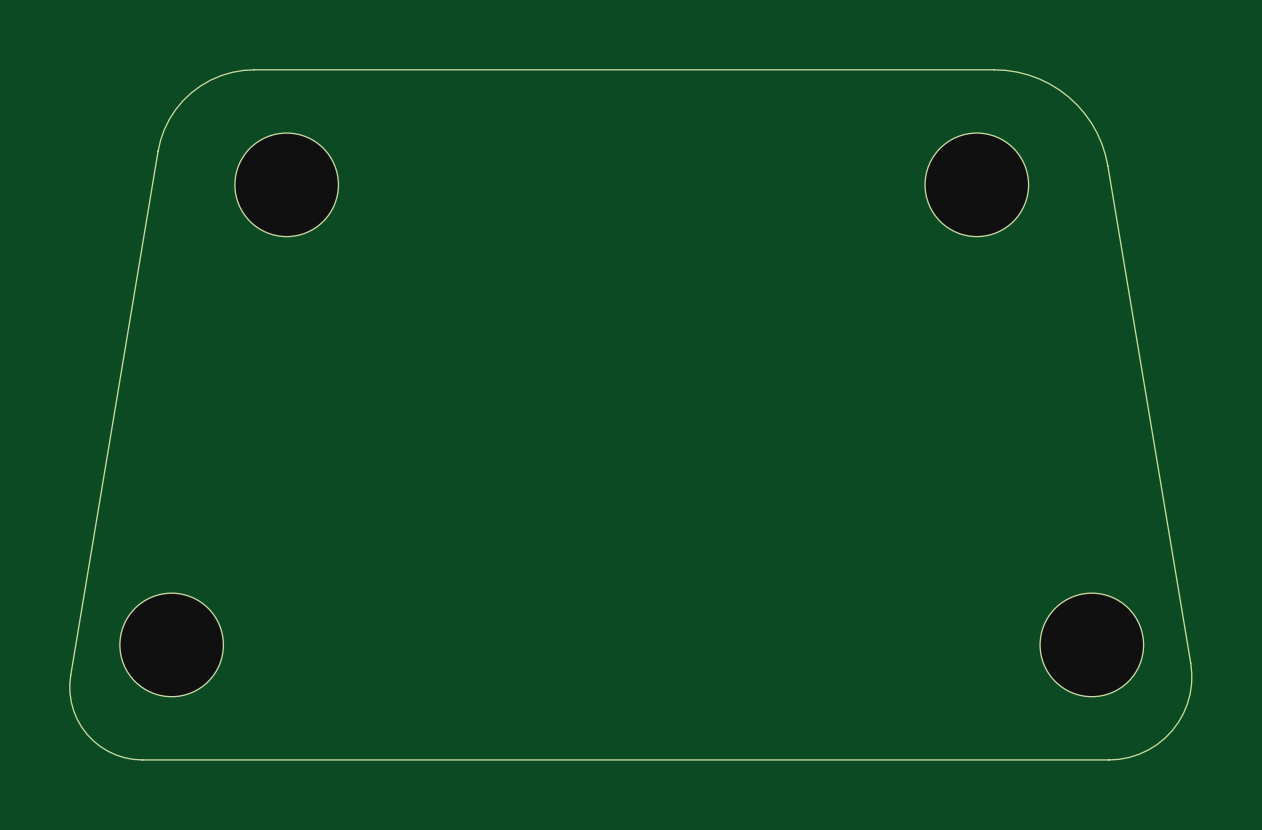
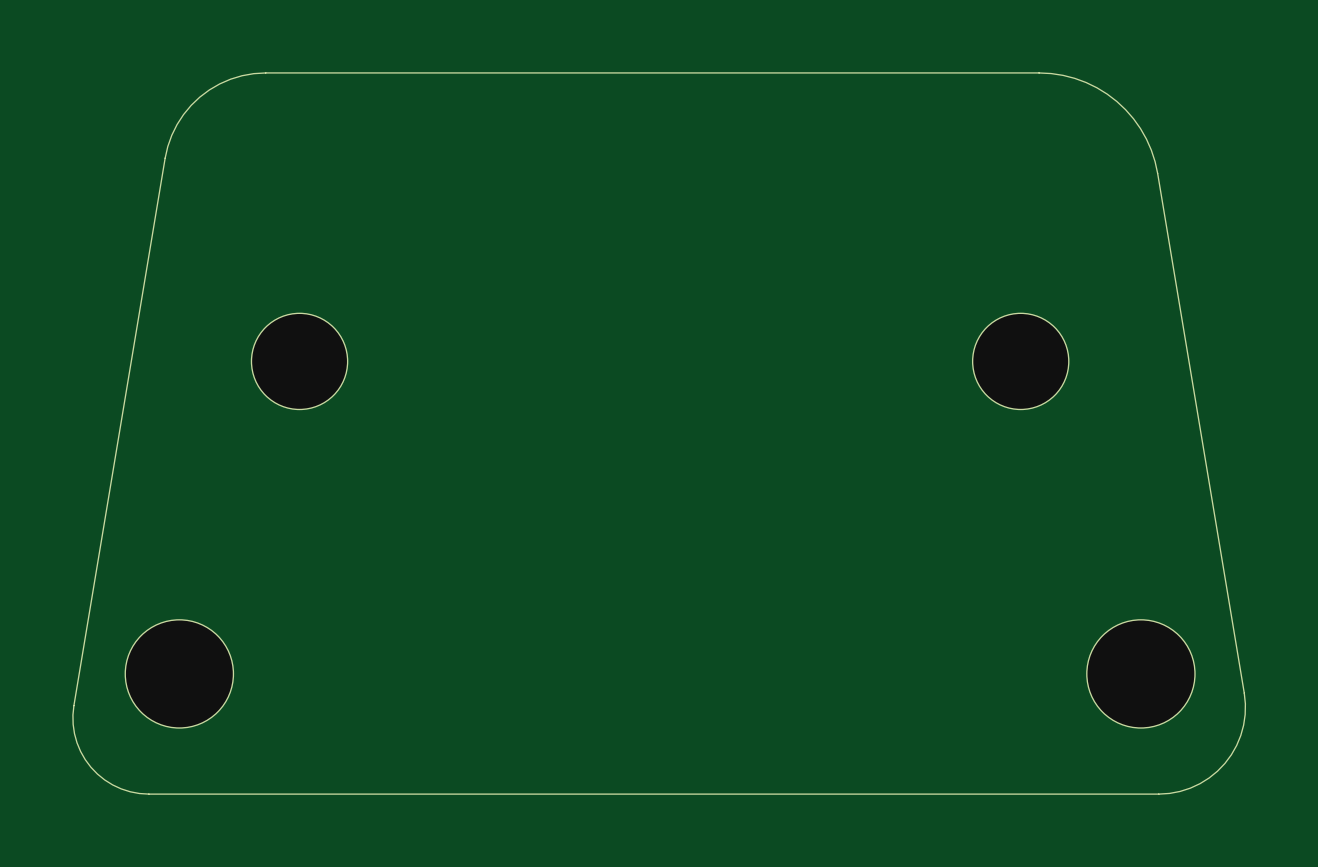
hole: (286, 184) -> none
hole: (976, 184) -> none
hole: none -> (299, 361)
hole: none -> (1020, 361)

